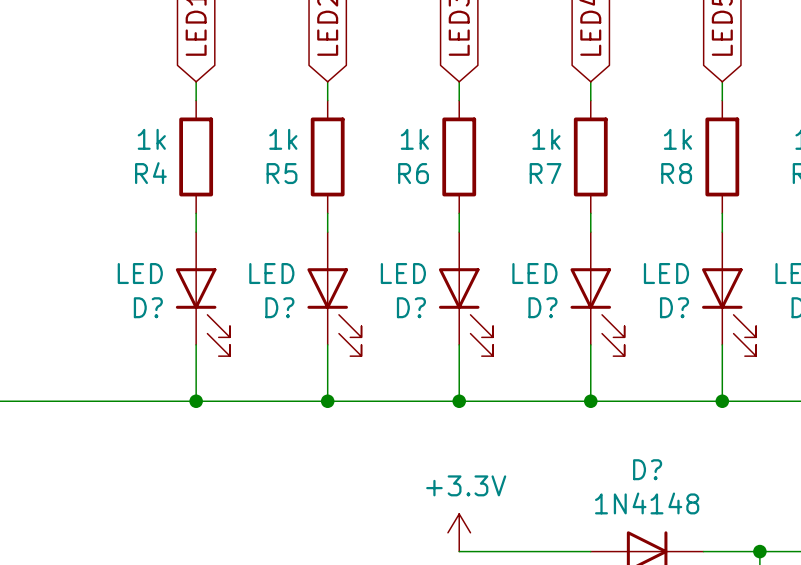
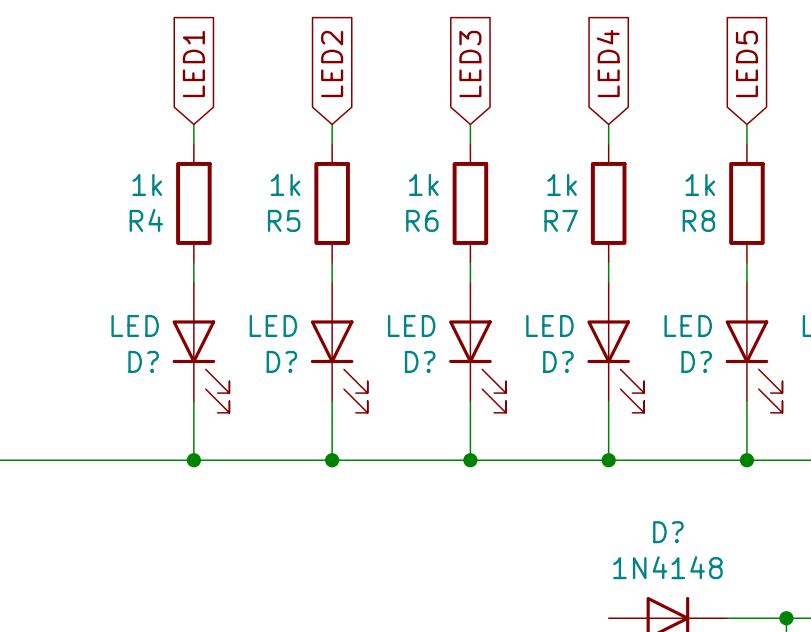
power symbol: +3.3V (459, 532) -> none
wire: (459, 551) (590, 551) -> none

